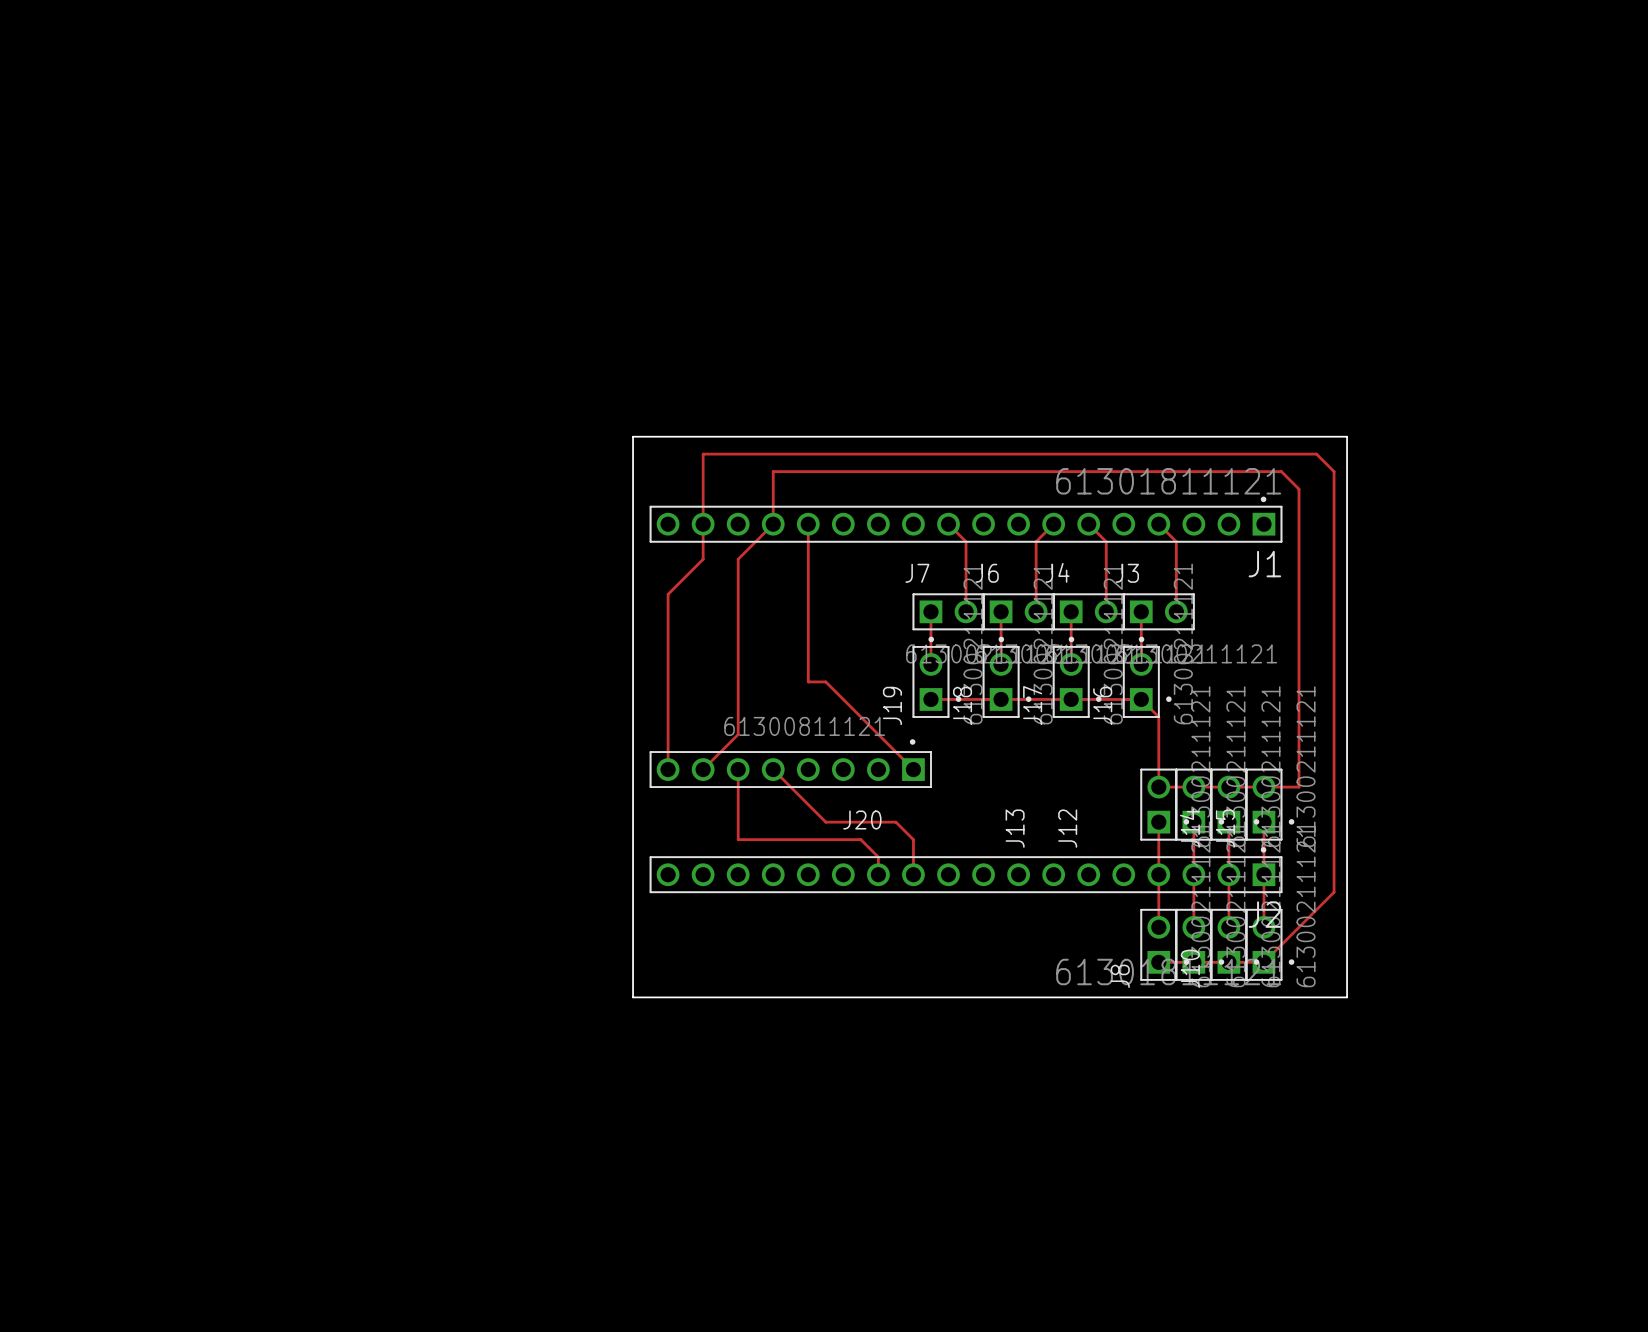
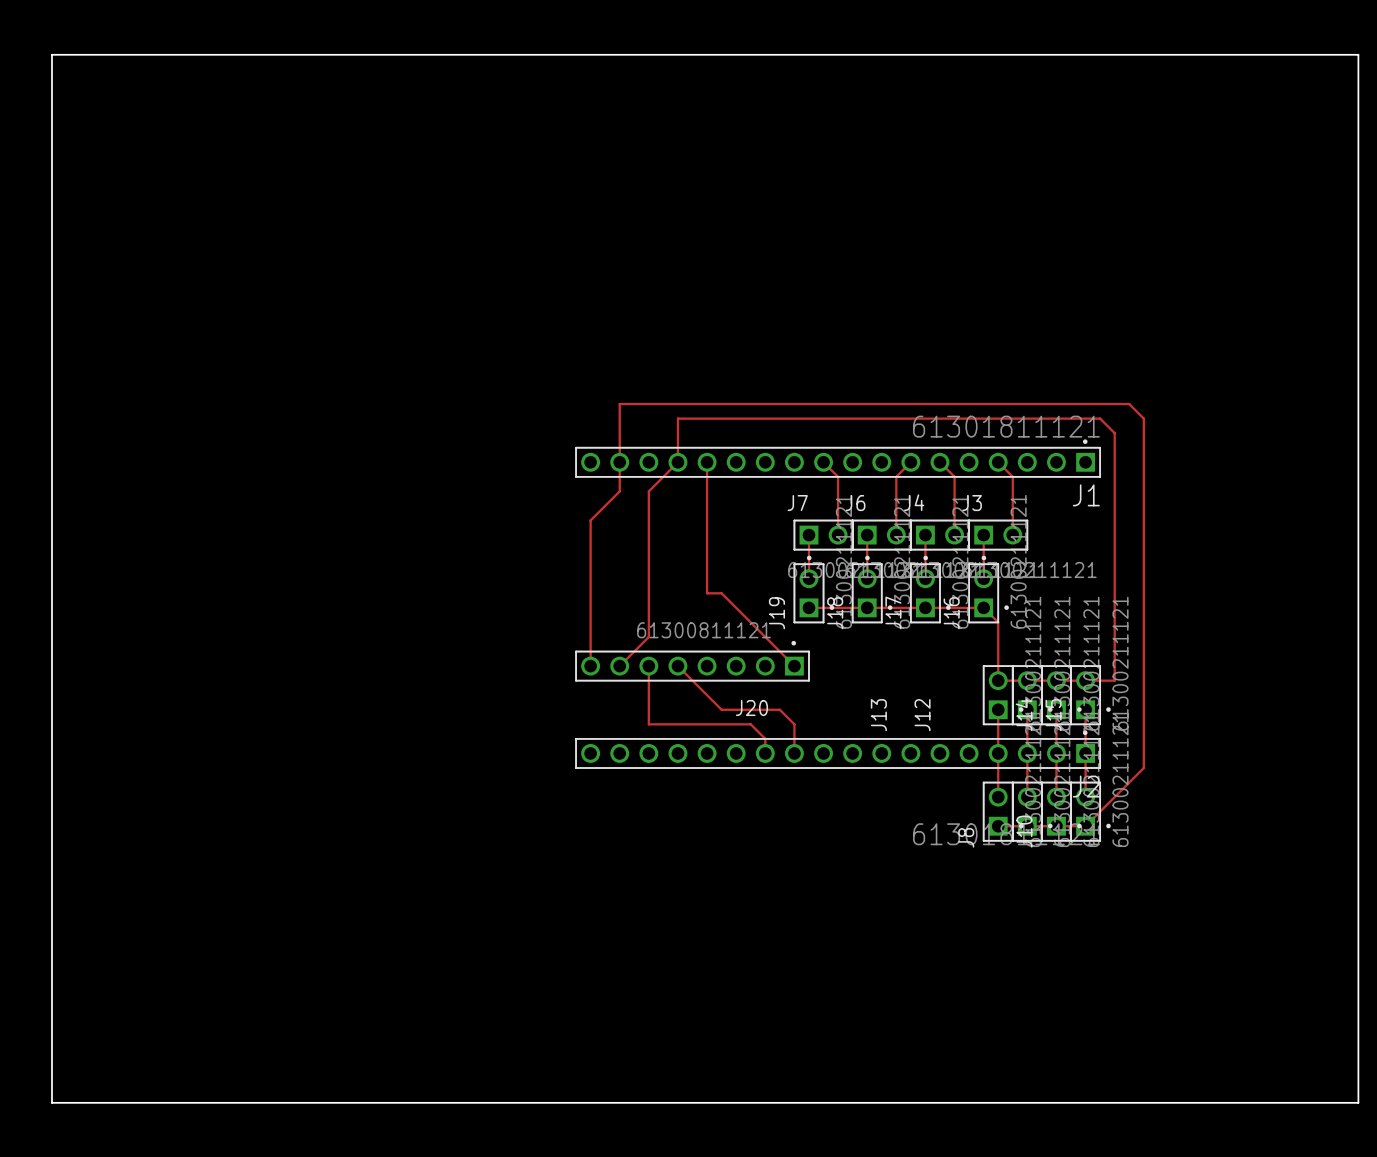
board edge: none -> (51, 54) (1358, 54) (1358, 1102) (51, 1102) (51, 54)
board edge: (633, 436) (1347, 436) (1347, 997) (633, 997) (633, 436) -> none

